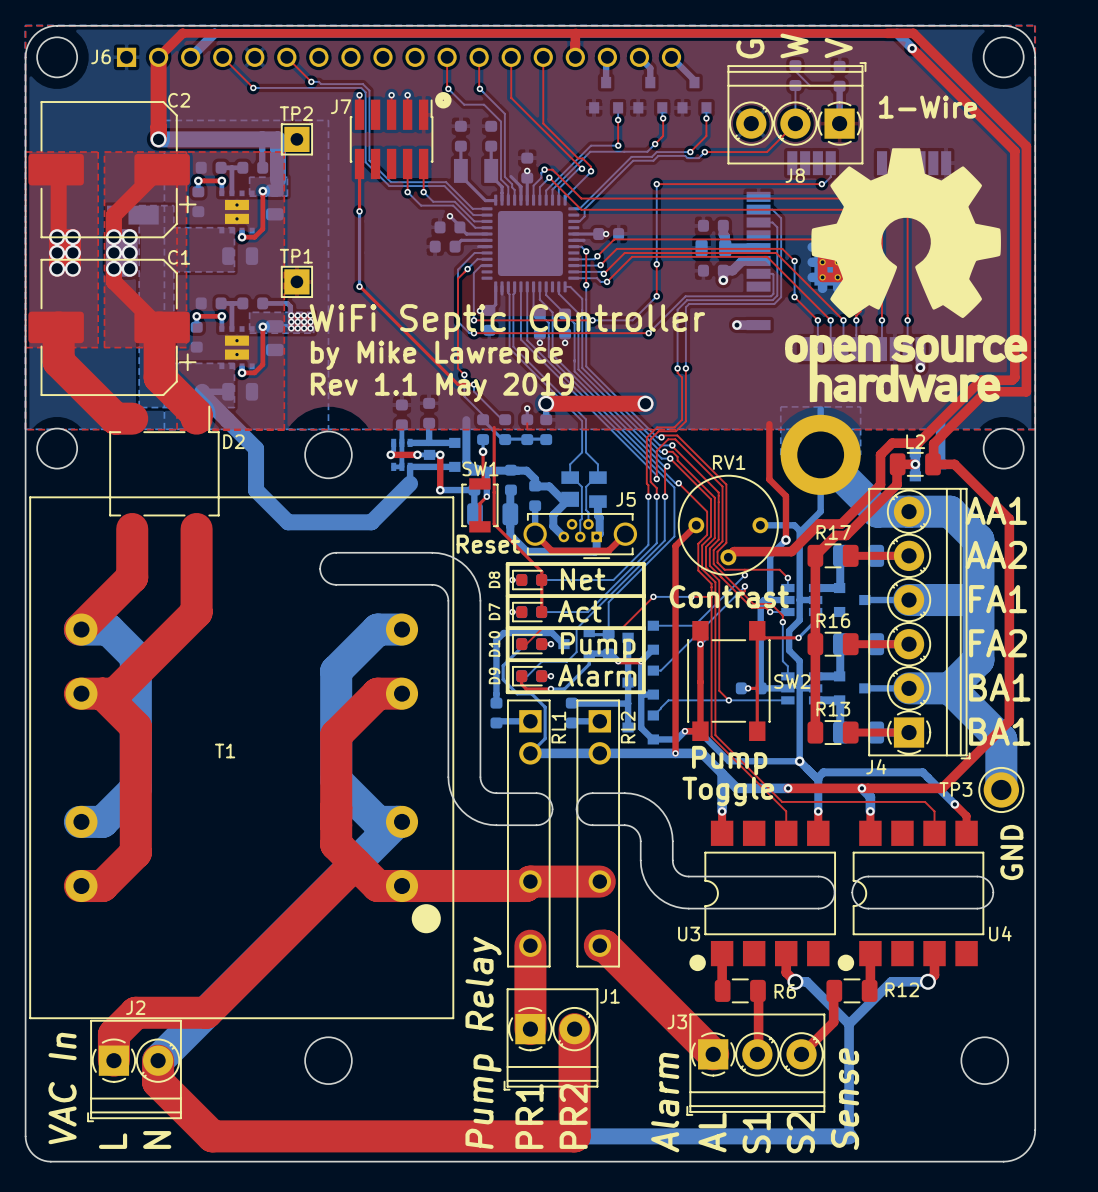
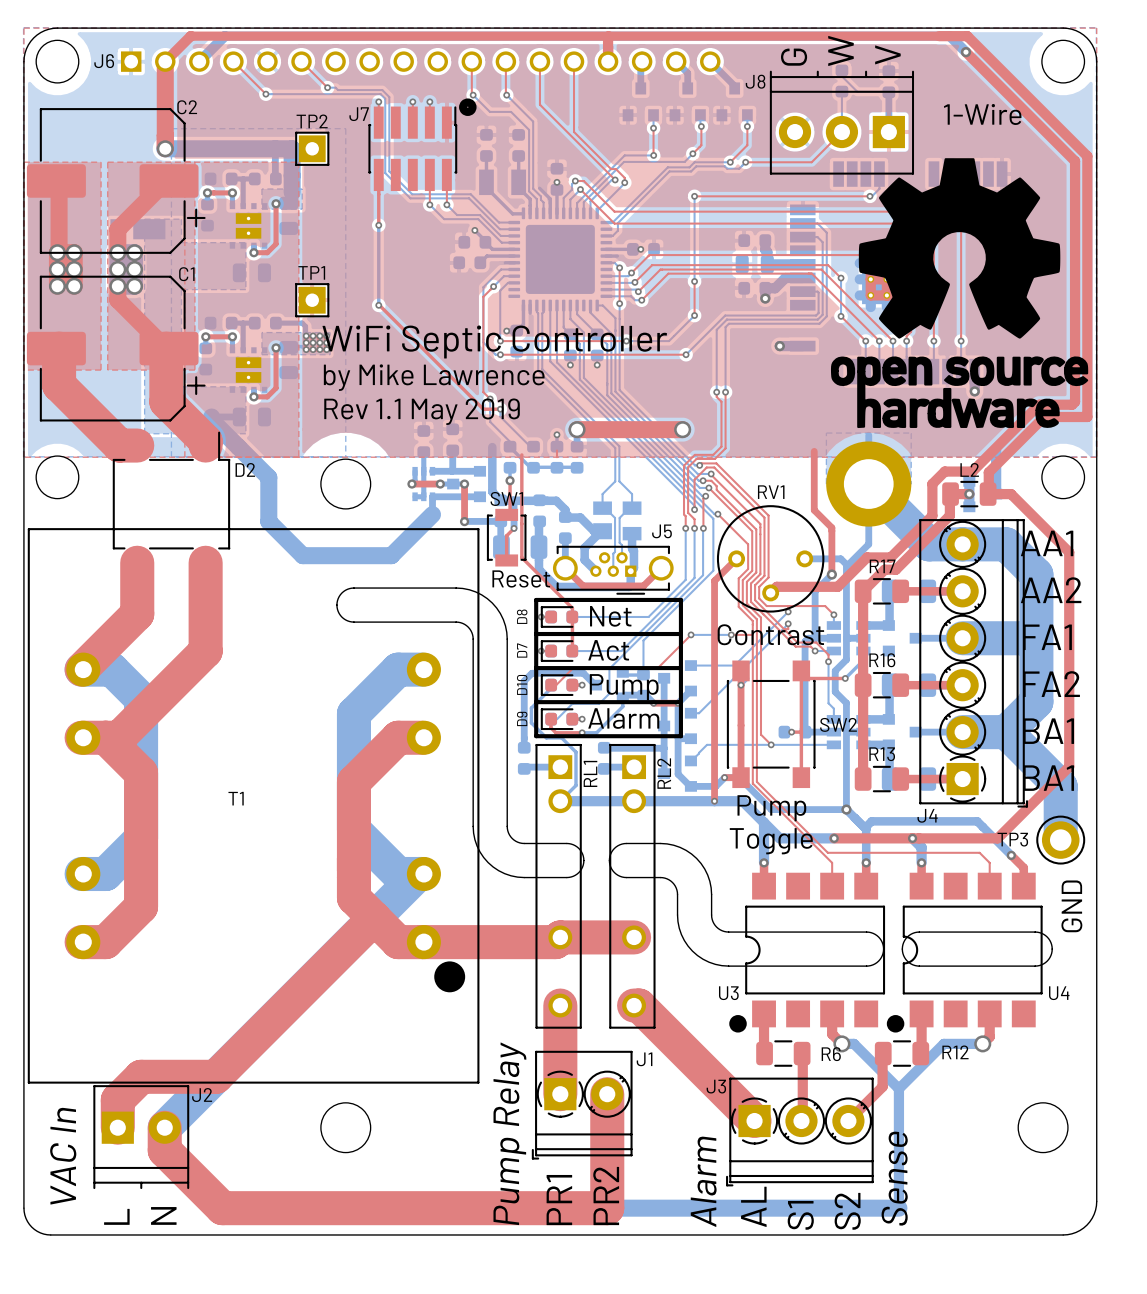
J8 footprint: [727, 62, 867, 165] -> [769, 70, 915, 175]
J8 name position: J8 (795, 175) -> J8 (755, 81)
J2 name position: J2 (135, 1007) -> J2 (202, 1095)
J2 footprint: [87, 1019, 182, 1123] -> [93, 1085, 190, 1190]

